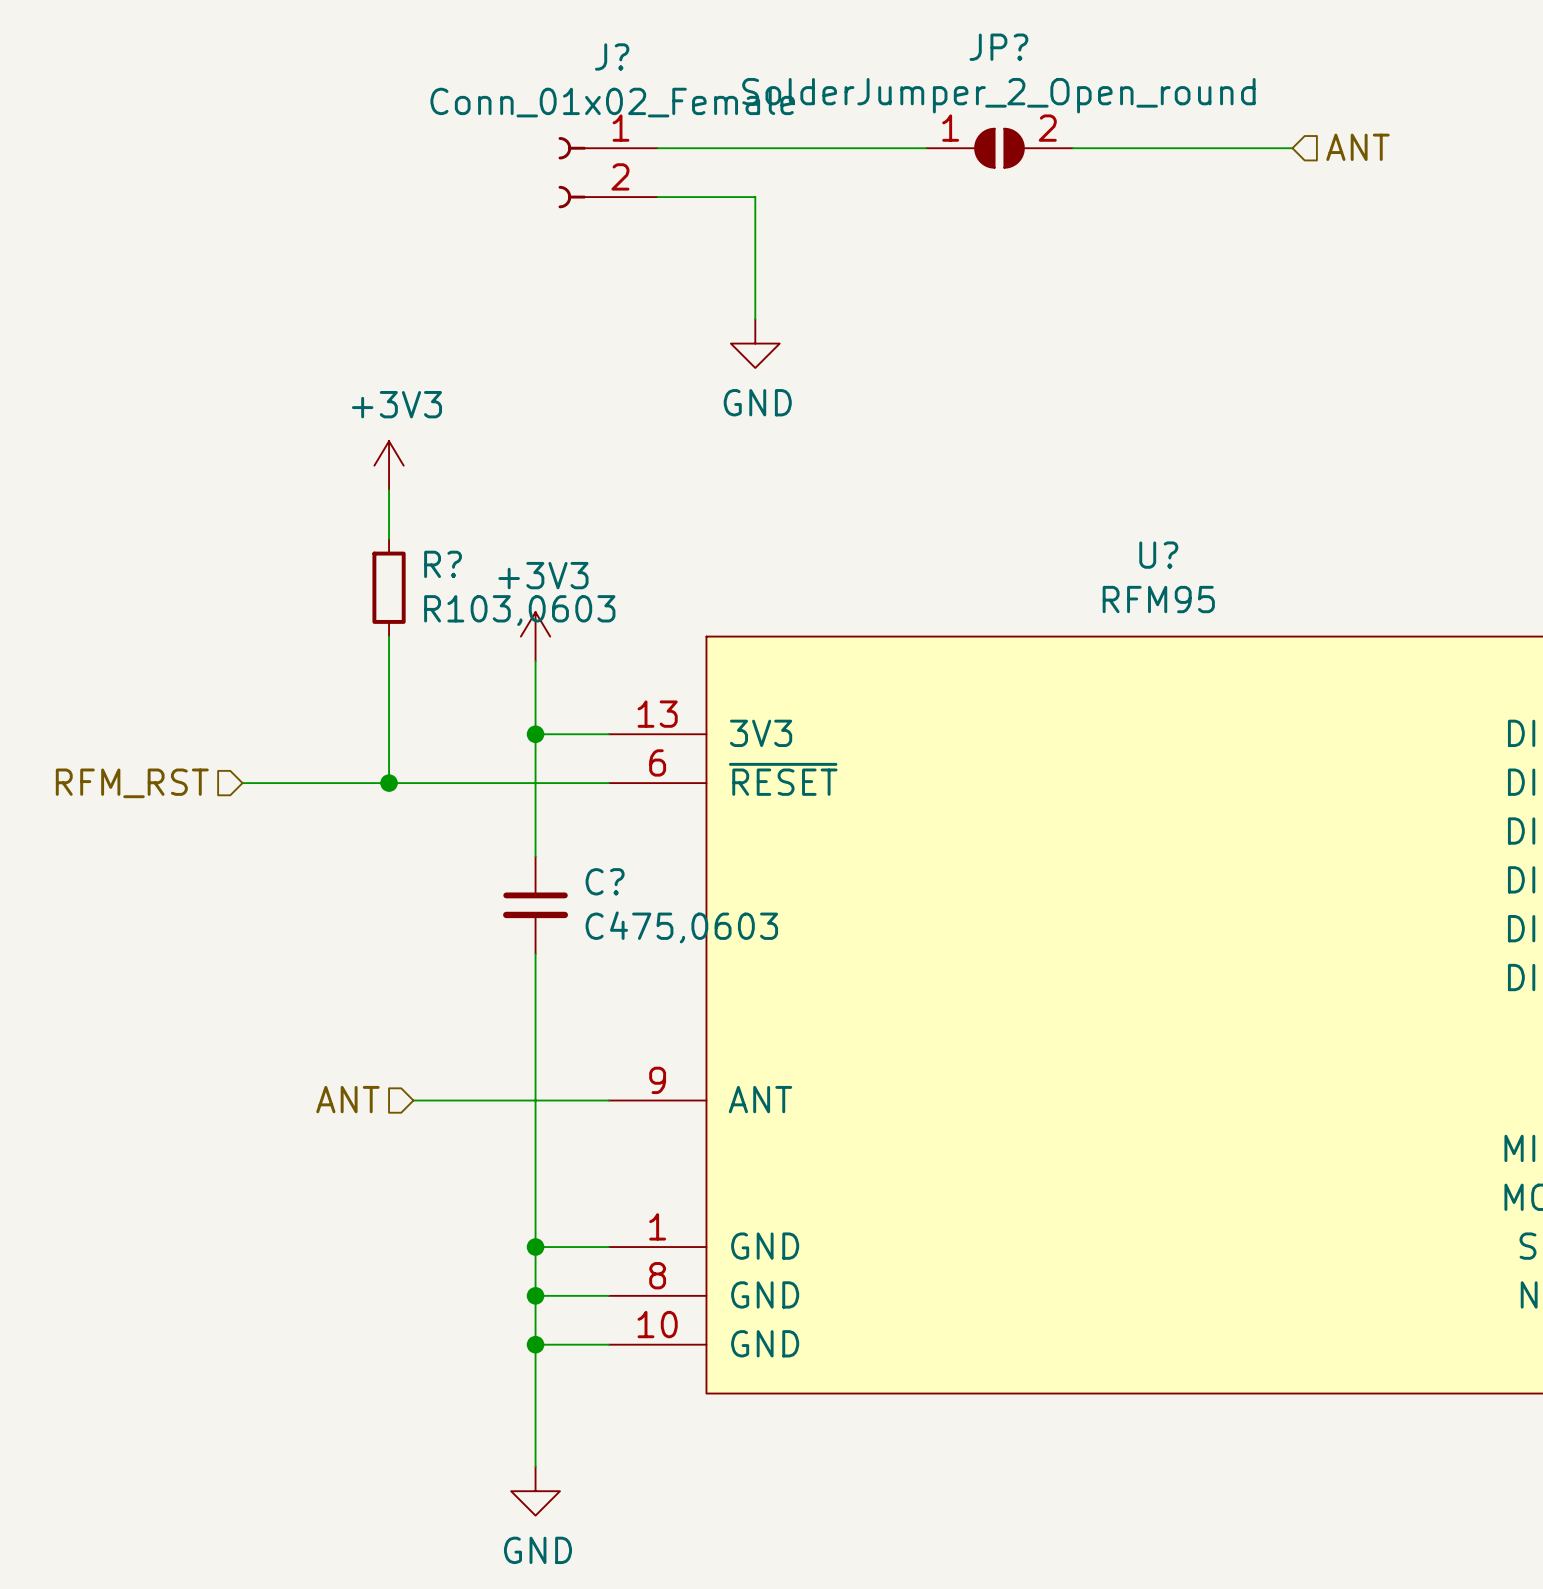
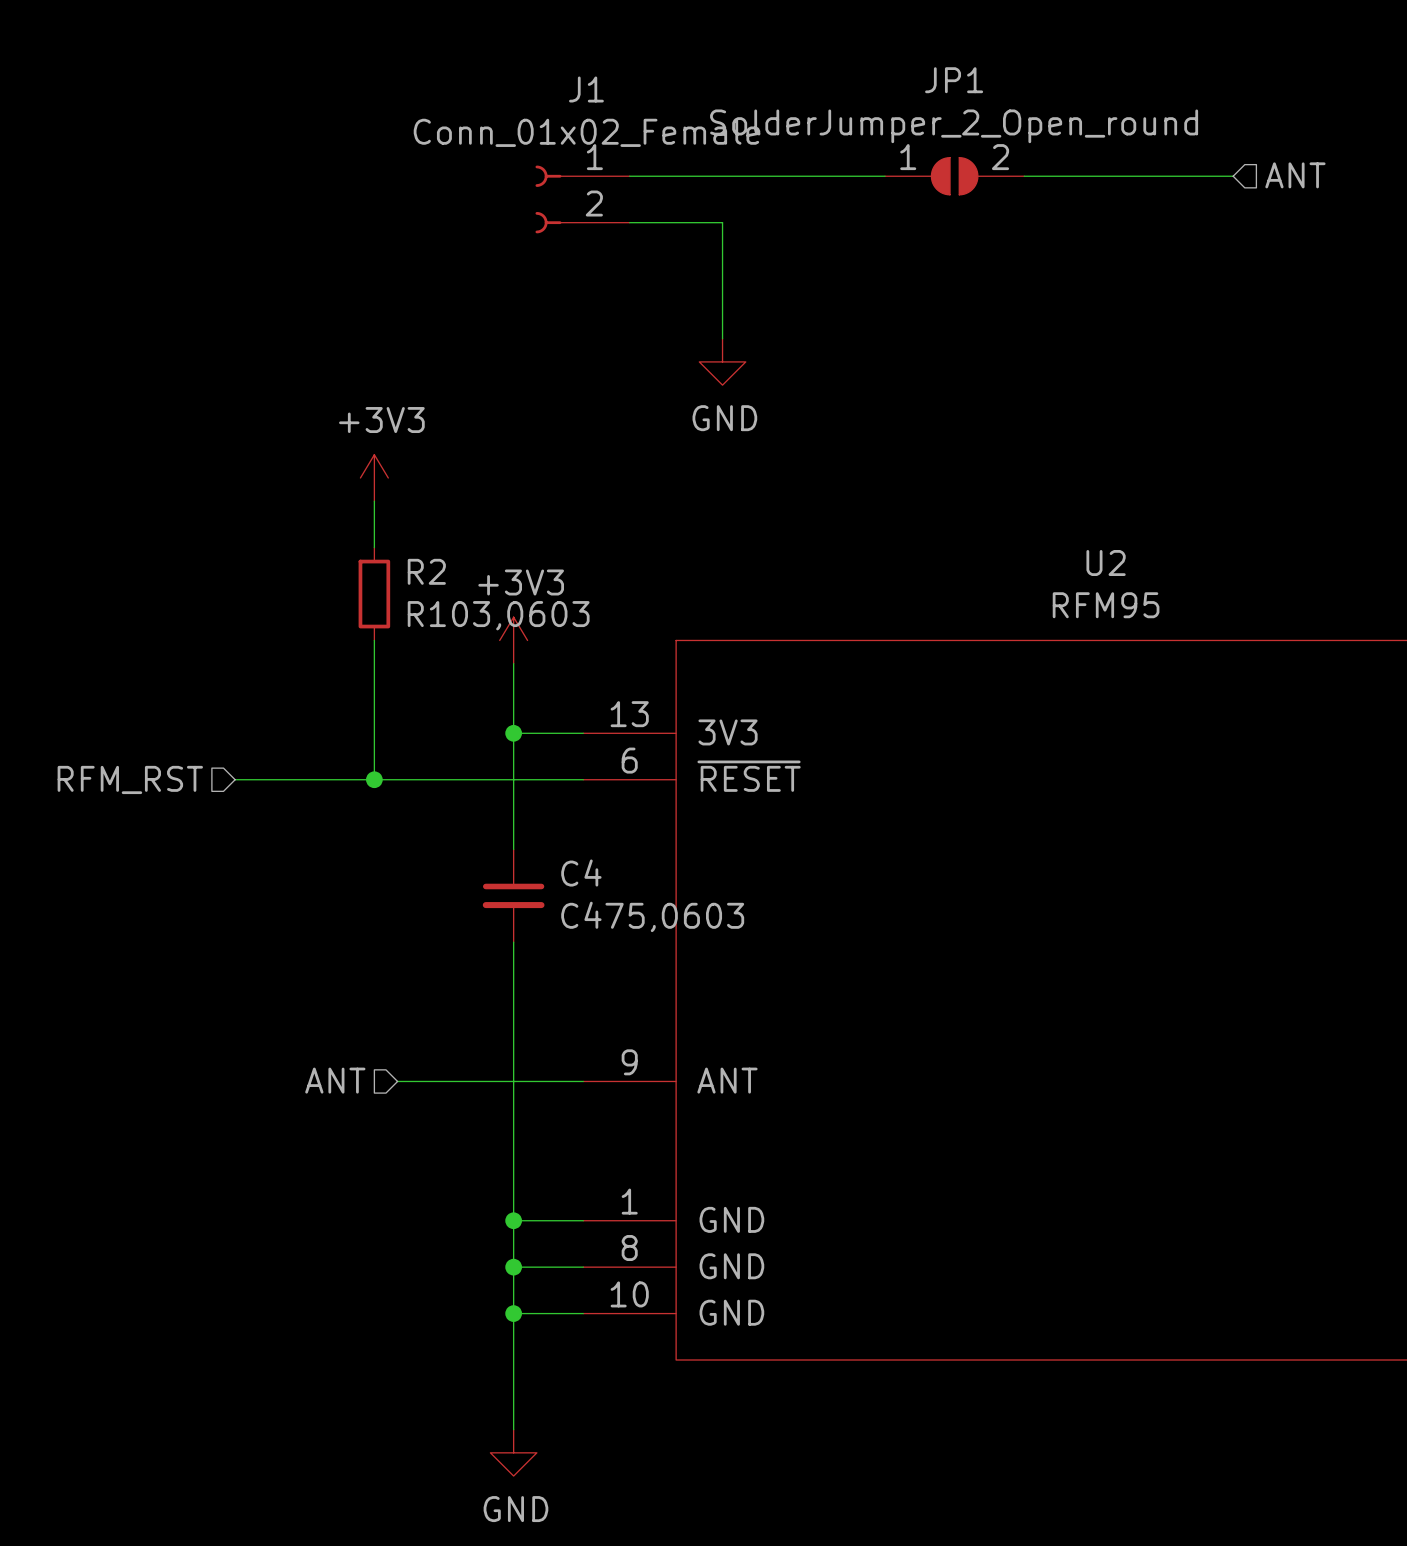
JP? name: JP? (998, 47) -> JP1 (954, 80)
J? name: J? (612, 56) -> J1 (586, 89)
U? name: U? (1158, 555) -> U2 (1106, 563)
R? name: R? (443, 564) -> R2 (426, 571)
C? name: C? (605, 881) -> C4 (581, 873)

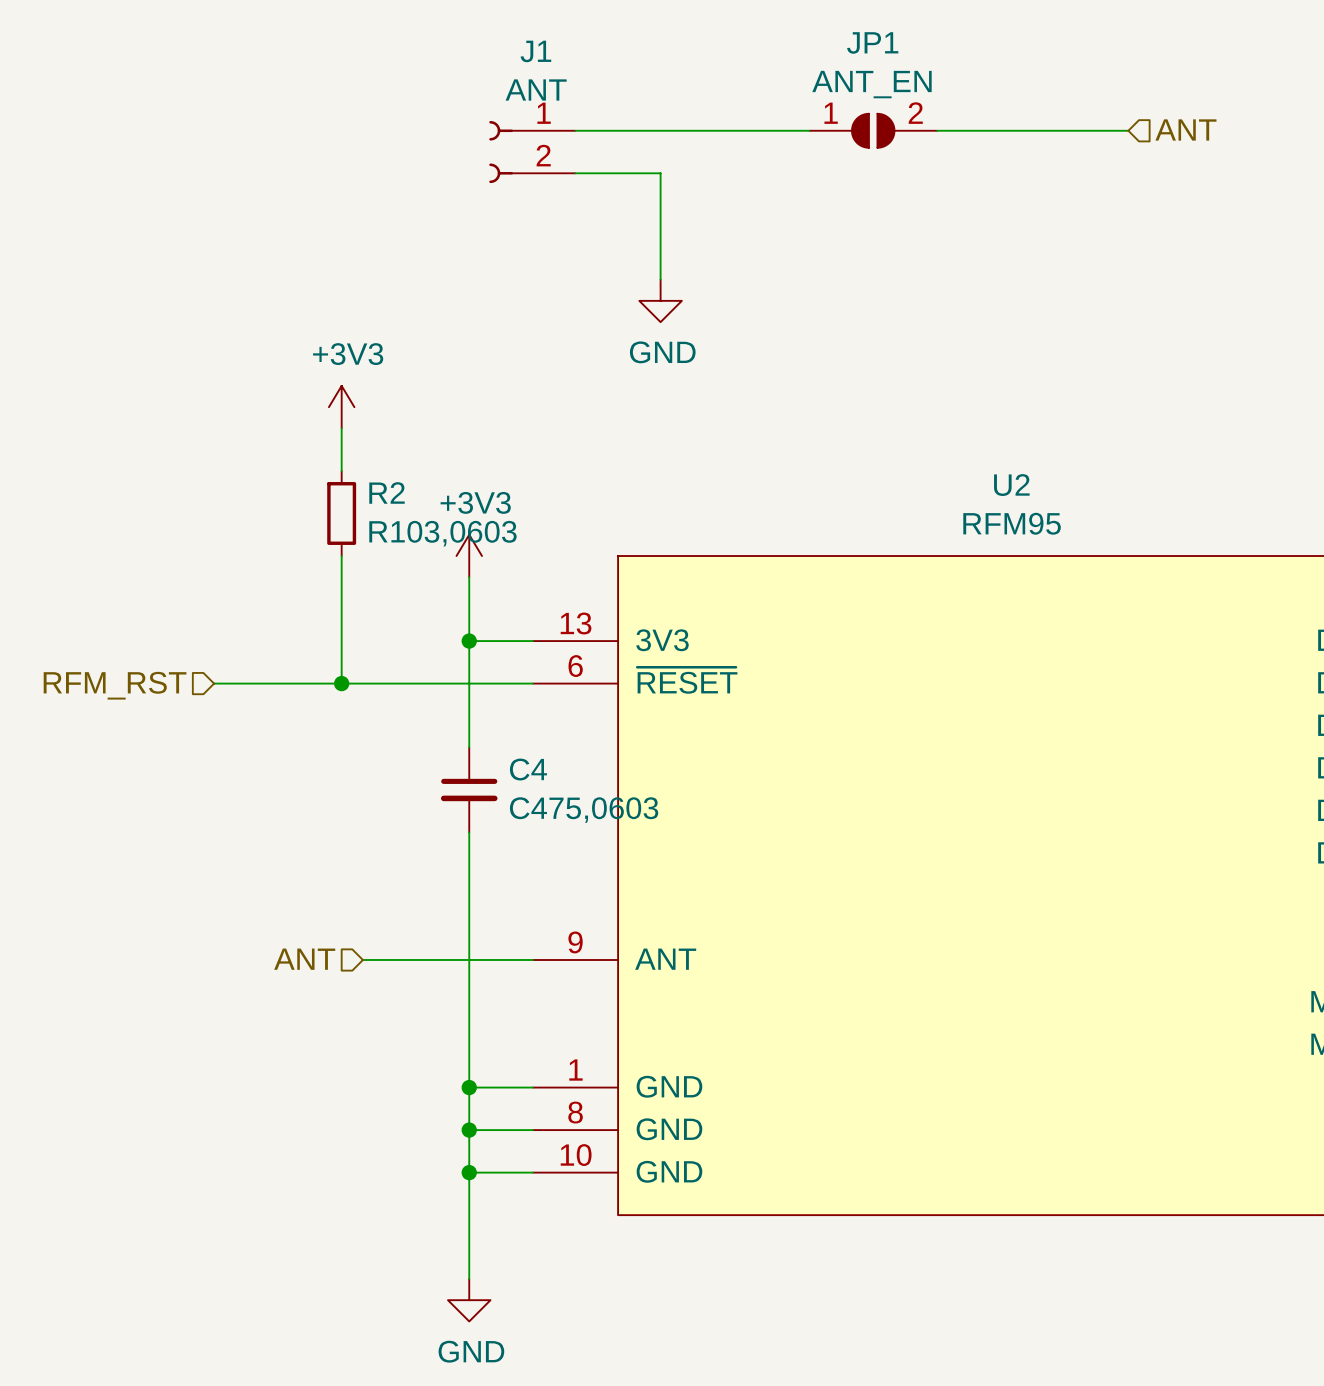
JP1 value: SolderJumper_2_Open_round (954, 126) -> ANT_EN (871, 84)
J1 value: Conn_01x02_Female (586, 132) -> ANT (536, 90)

